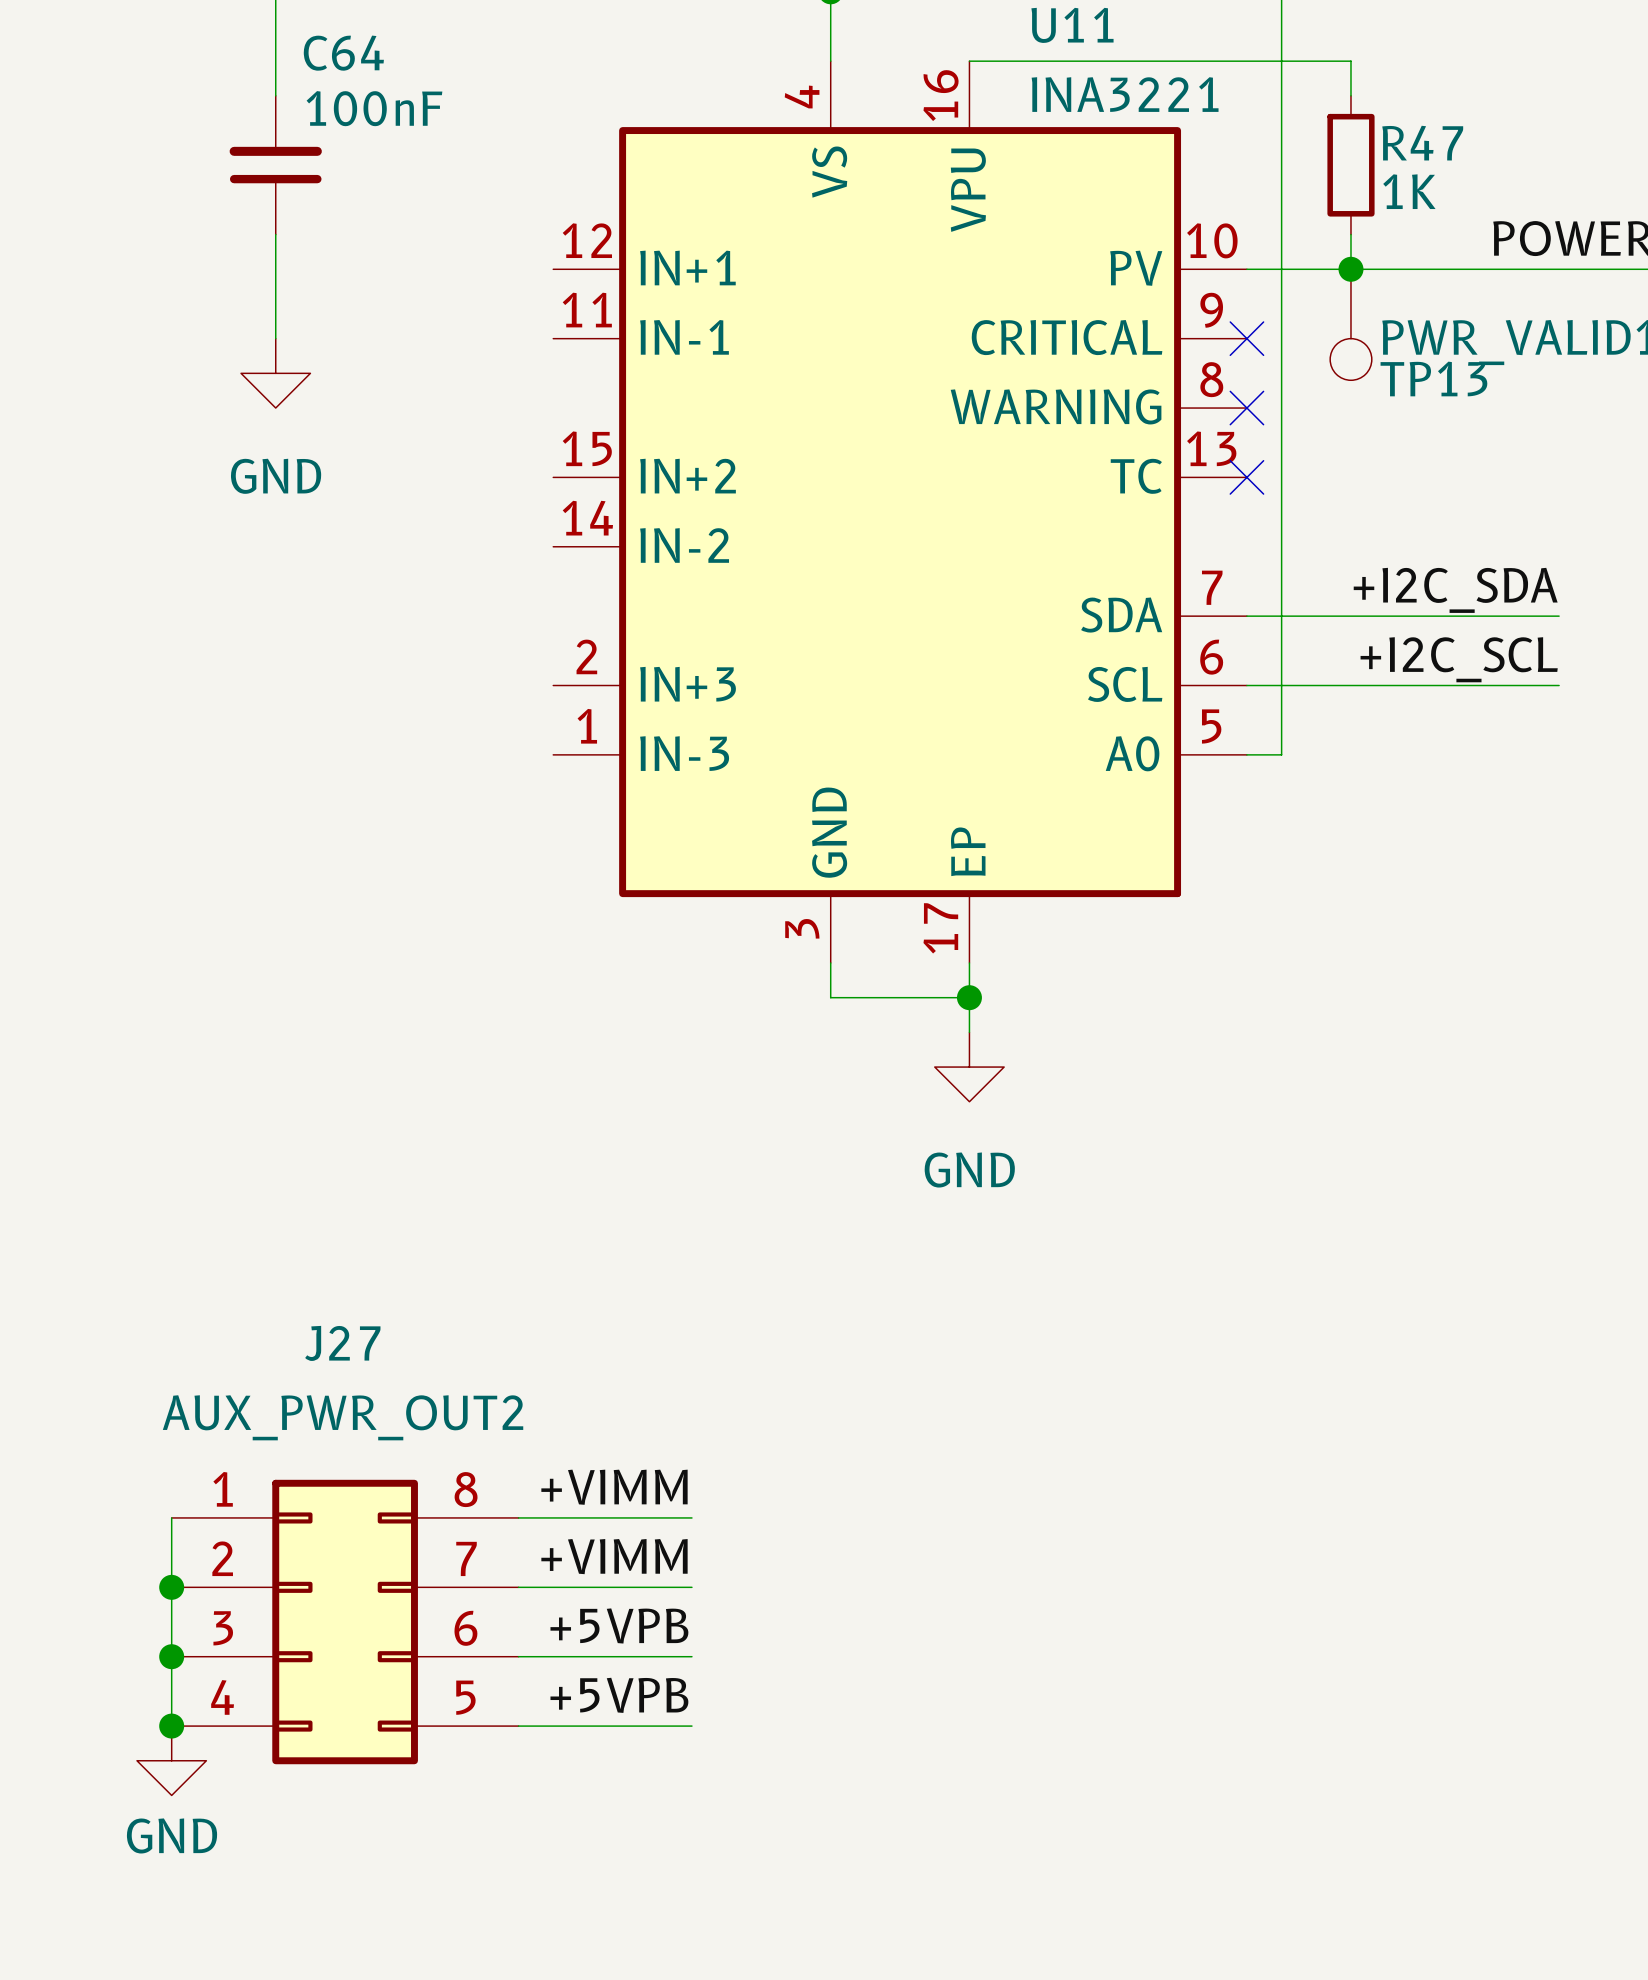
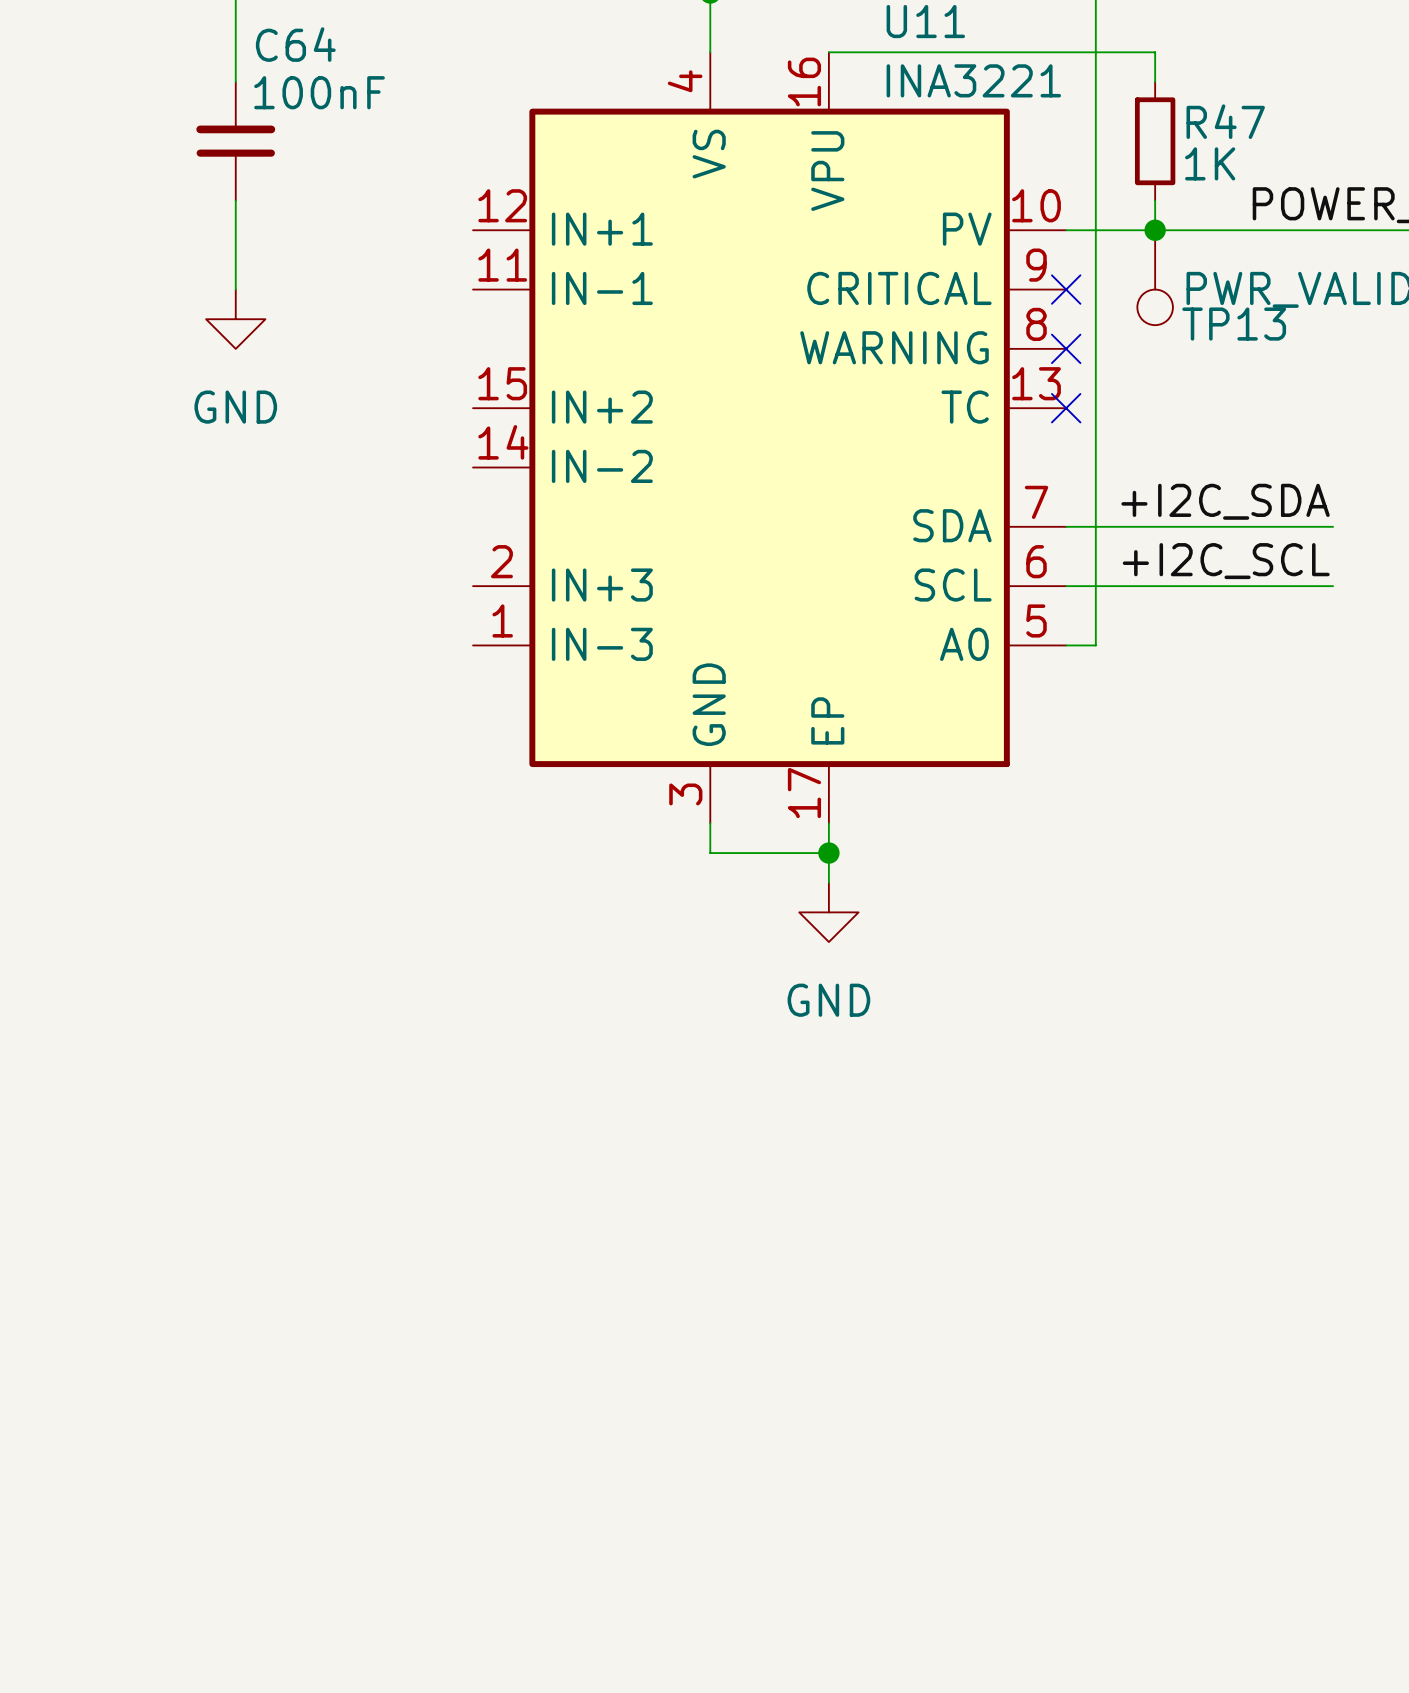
label: +VIMM (614, 1487) -> none
wire: (171, 1517) (171, 1726) -> none
wire: (518, 1517) (691, 1517) -> none
label: +VIMM (614, 1556) -> none
junction: (171, 1587) -> none
wire: (518, 1587) (691, 1587) -> none
J27: AUX_PWR_OUT2 (345, 1622) -> none
label: +5VPB (619, 1625) -> none
junction: (171, 1656) -> none
wire: (518, 1656) (691, 1656) -> none
label: +5VPB (619, 1695) -> none
junction: (171, 1726) -> none
wire: (518, 1726) (691, 1726) -> none
power symbol: GND (171, 1760) -> none

